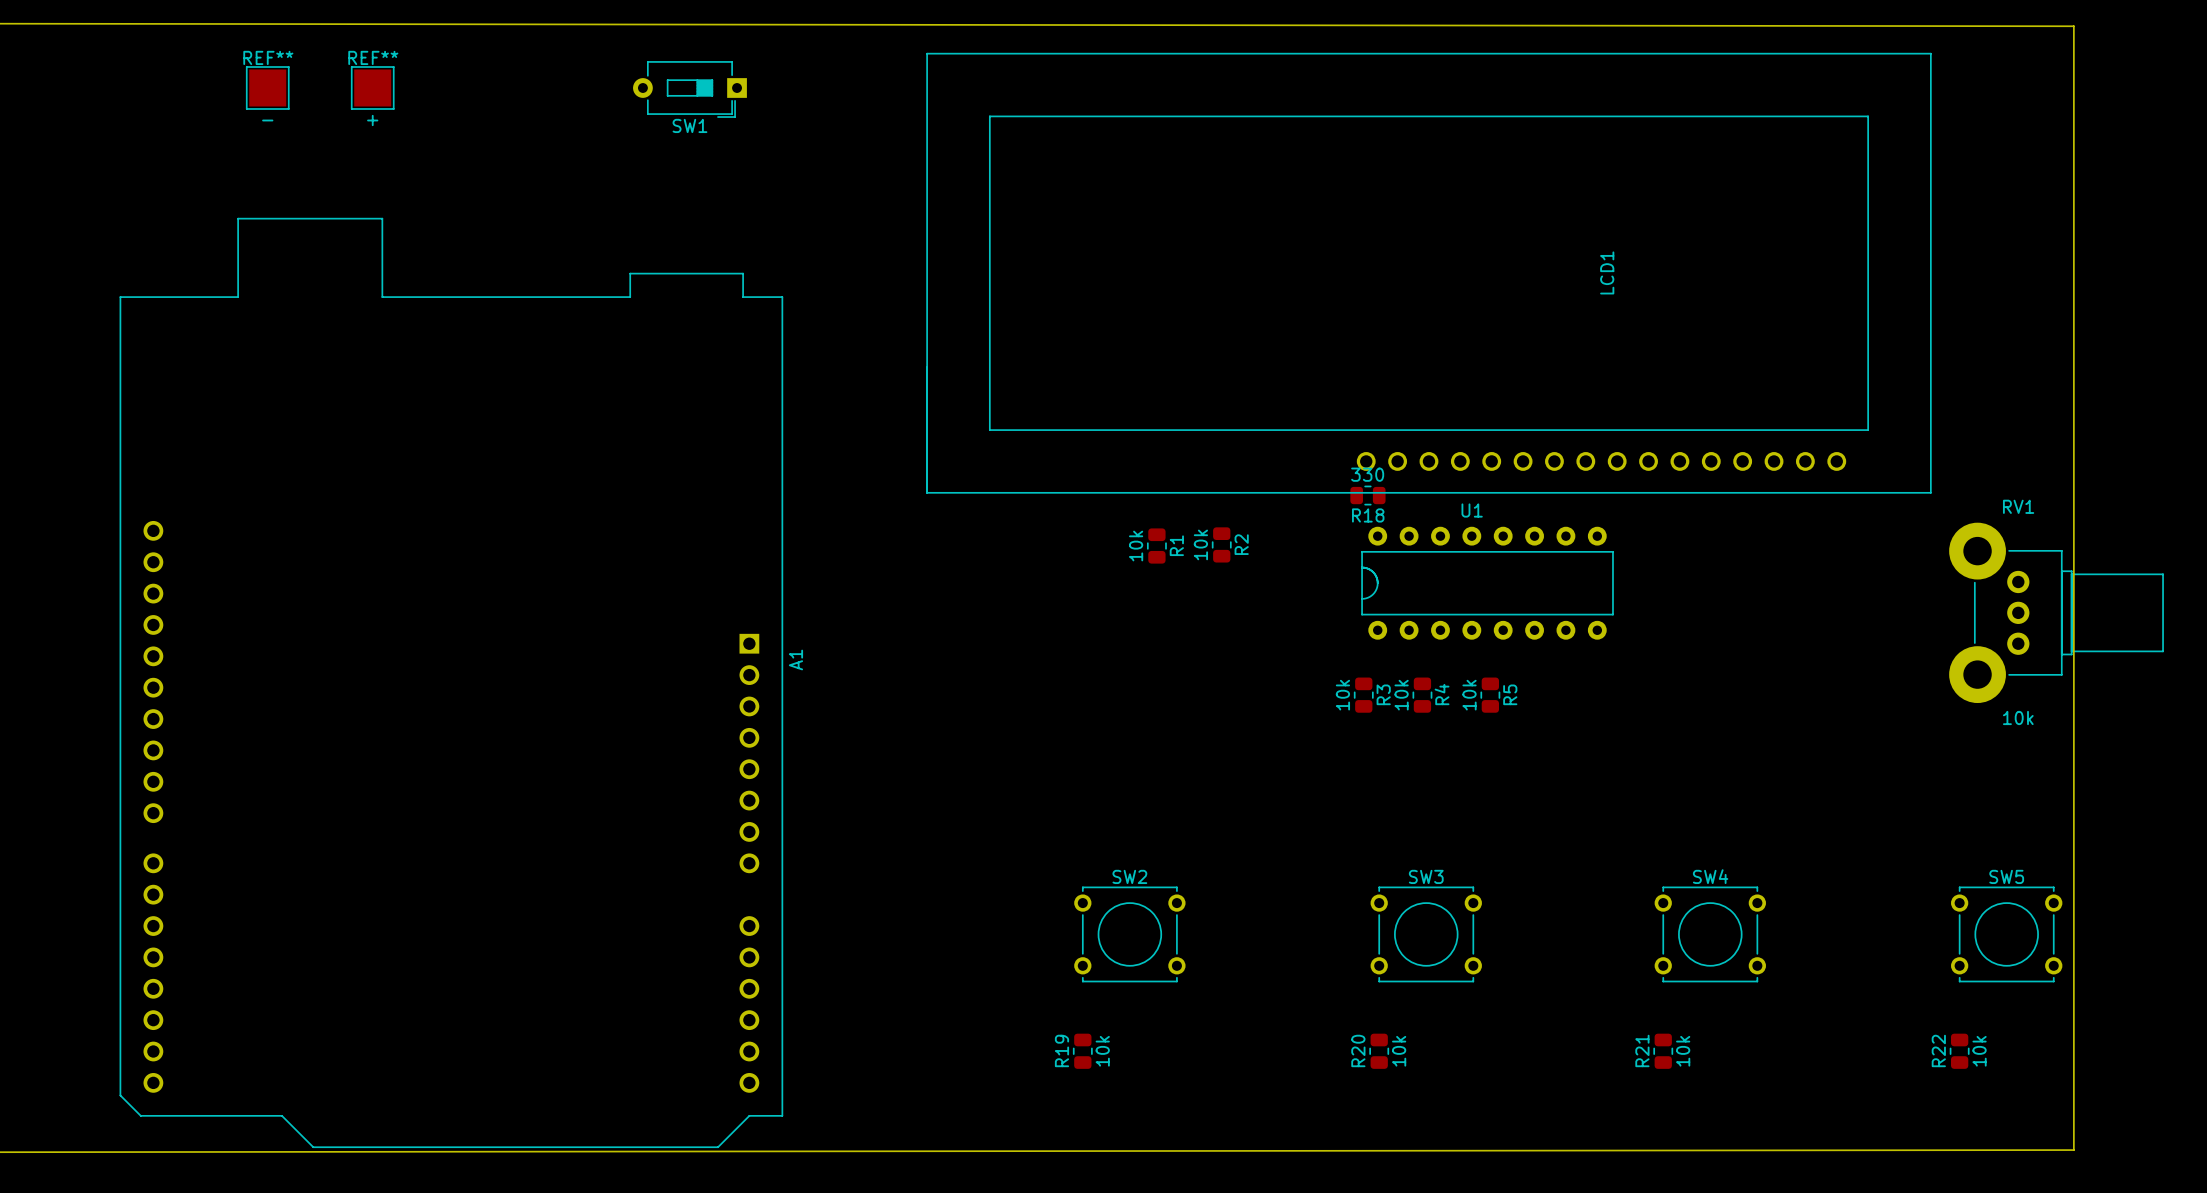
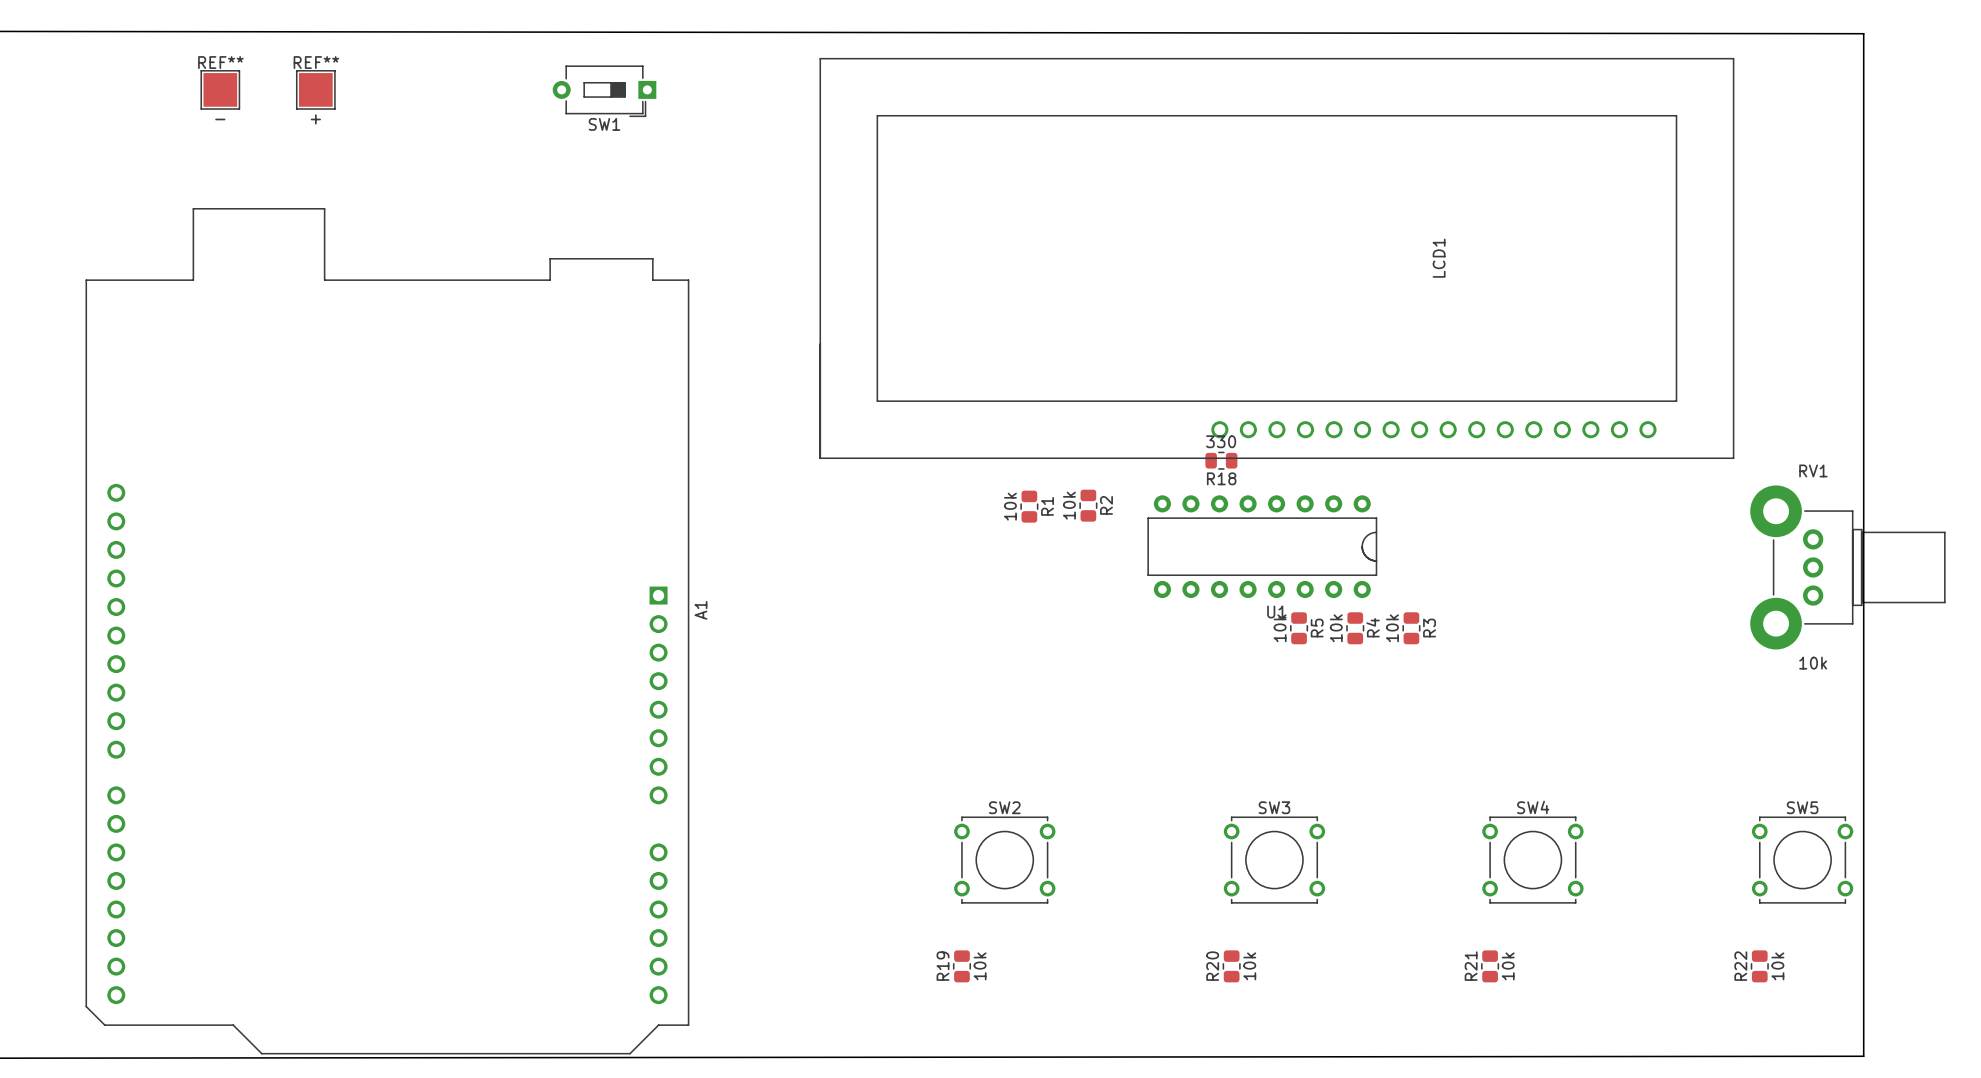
U1 rotation: 0° (1487, 583) -> 180° (1262, 546)
R3 position: (1363, 695) -> (1411, 628)
R4 position: (1422, 695) -> (1355, 628)
R5 position: (1490, 695) -> (1299, 628)

